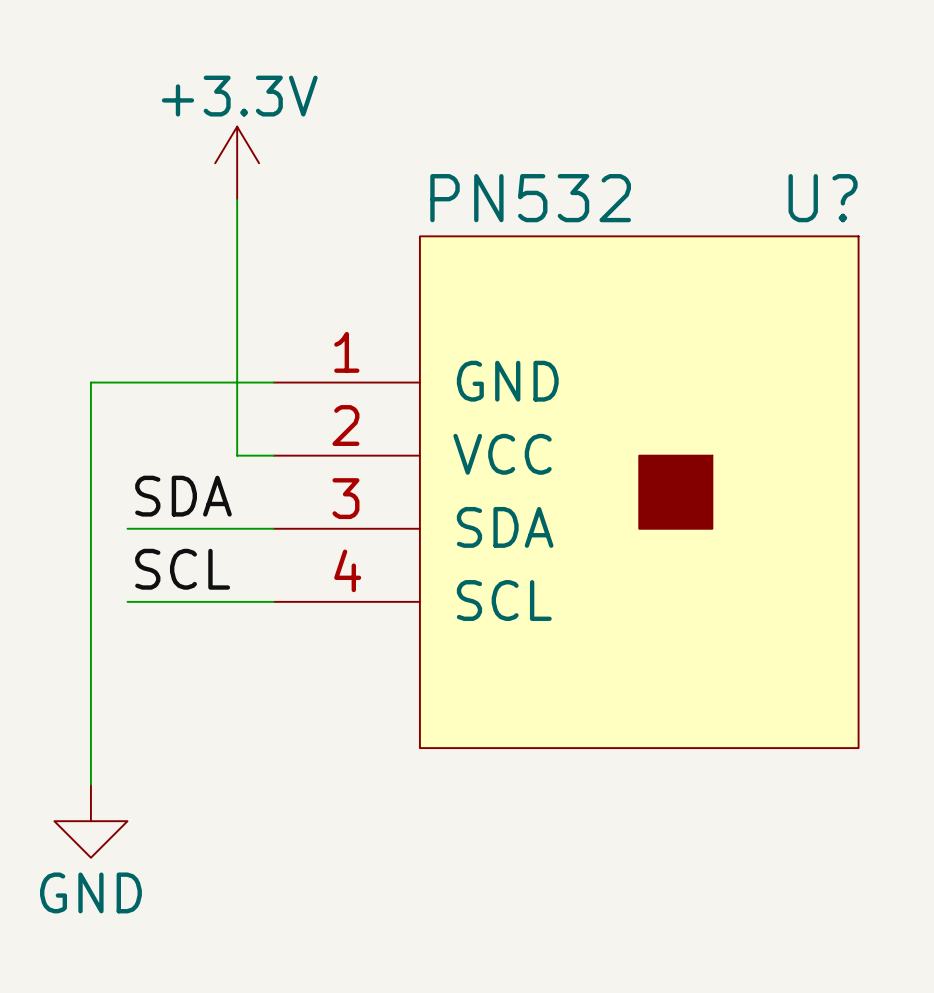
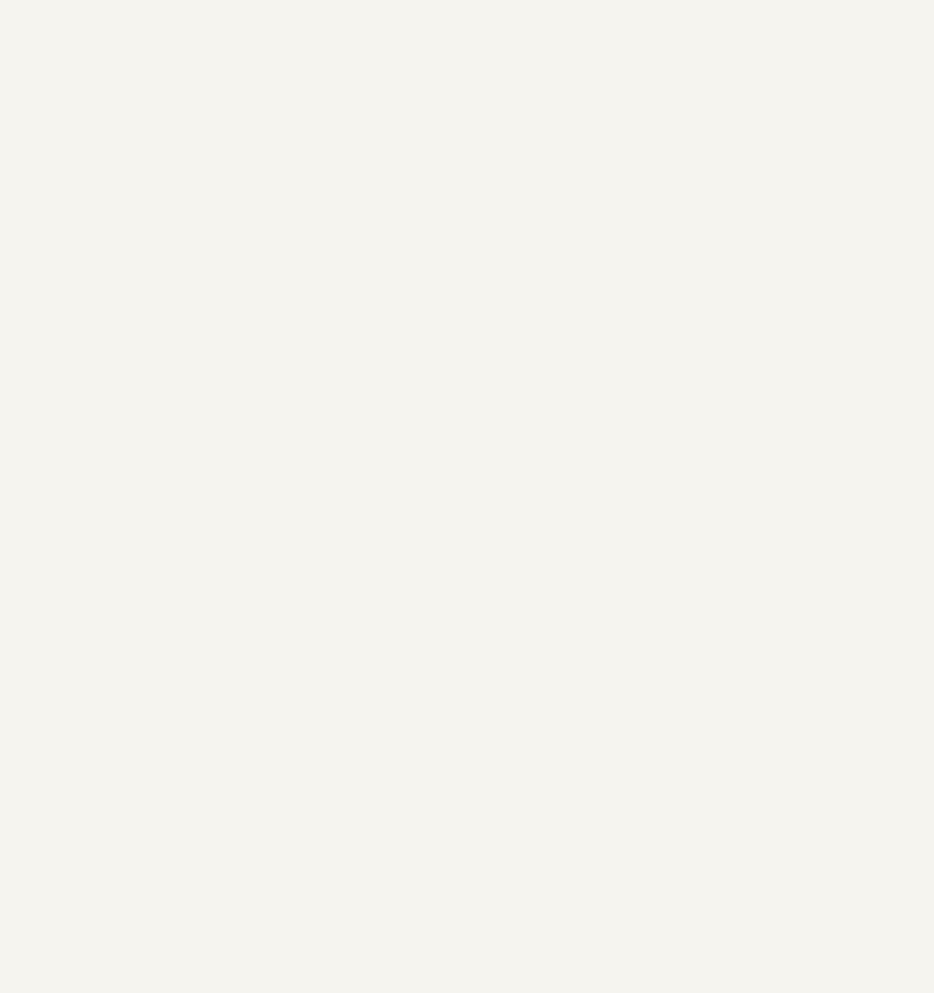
power symbol: +3.3V (237, 163) -> none
wire: (237, 199) (237, 455) (273, 455) -> none
wire: (273, 382) (90, 382) (90, 784) -> none
U?: PN532 (566, 492) -> none
label: SDA (183, 496) -> none
wire: (127, 528) (273, 528) -> none
label: SCL (182, 569) -> none
wire: (127, 601) (273, 601) -> none
power symbol: GND (90, 821) -> none

